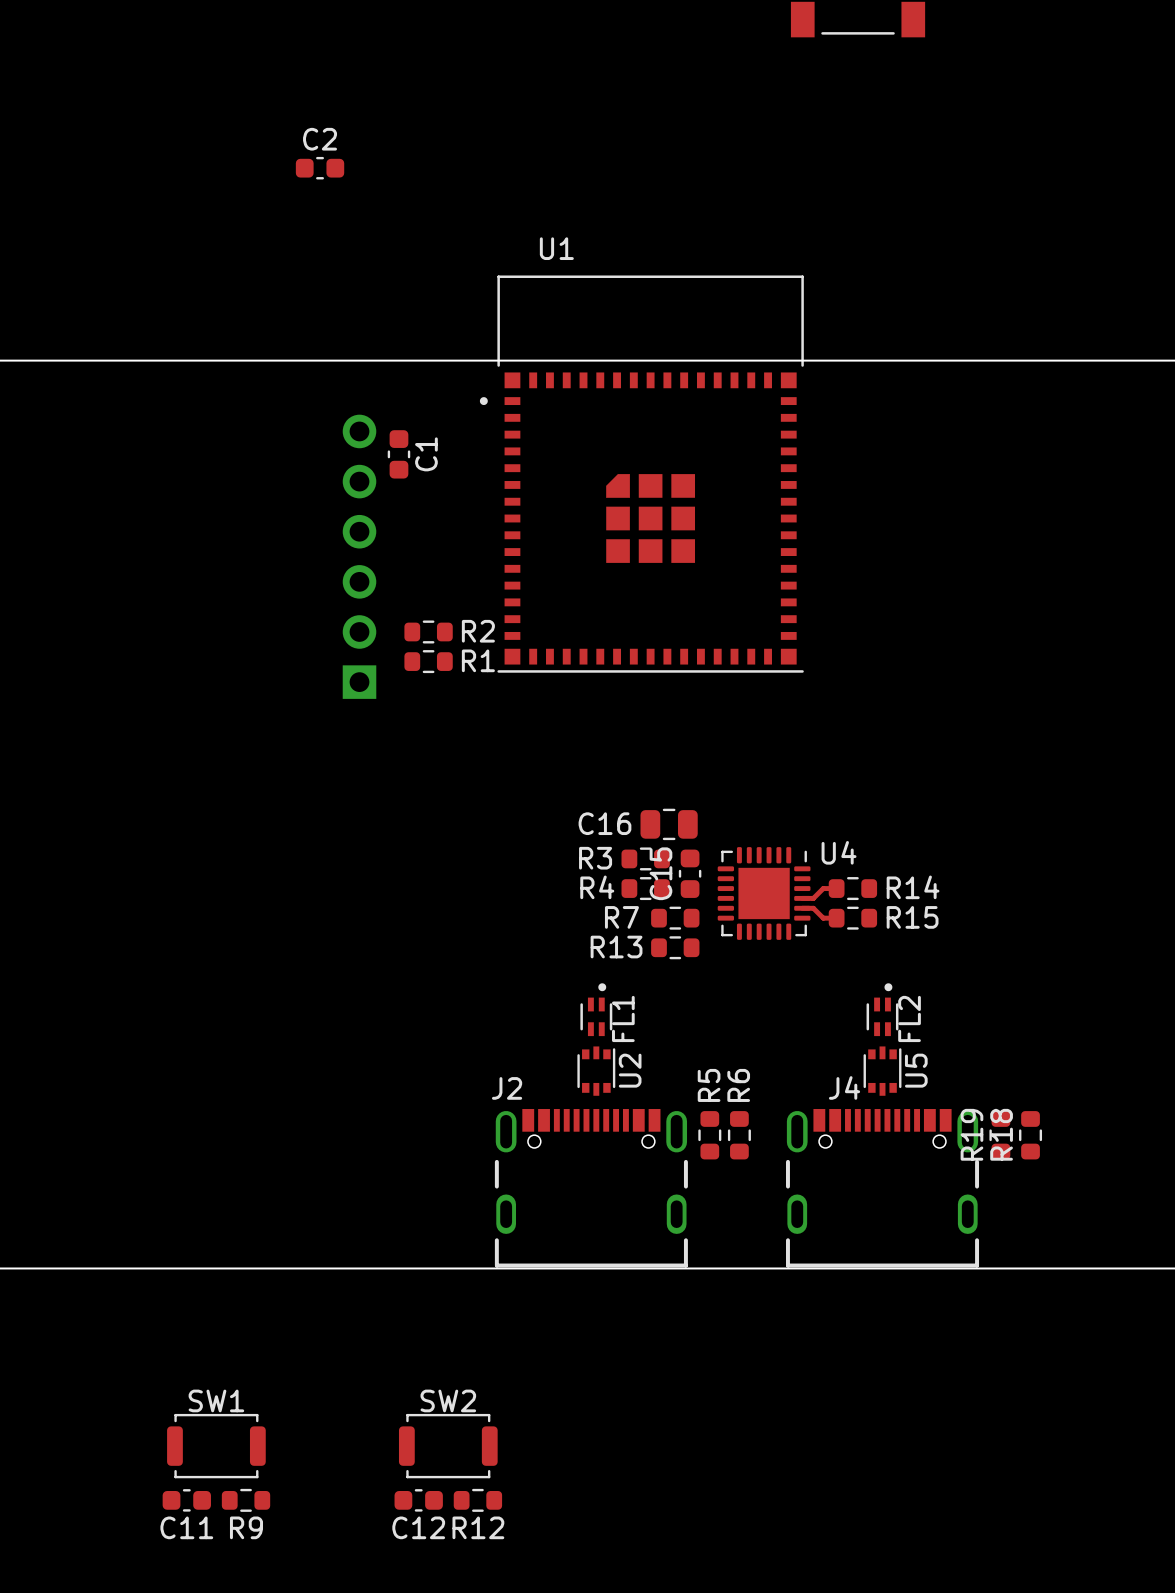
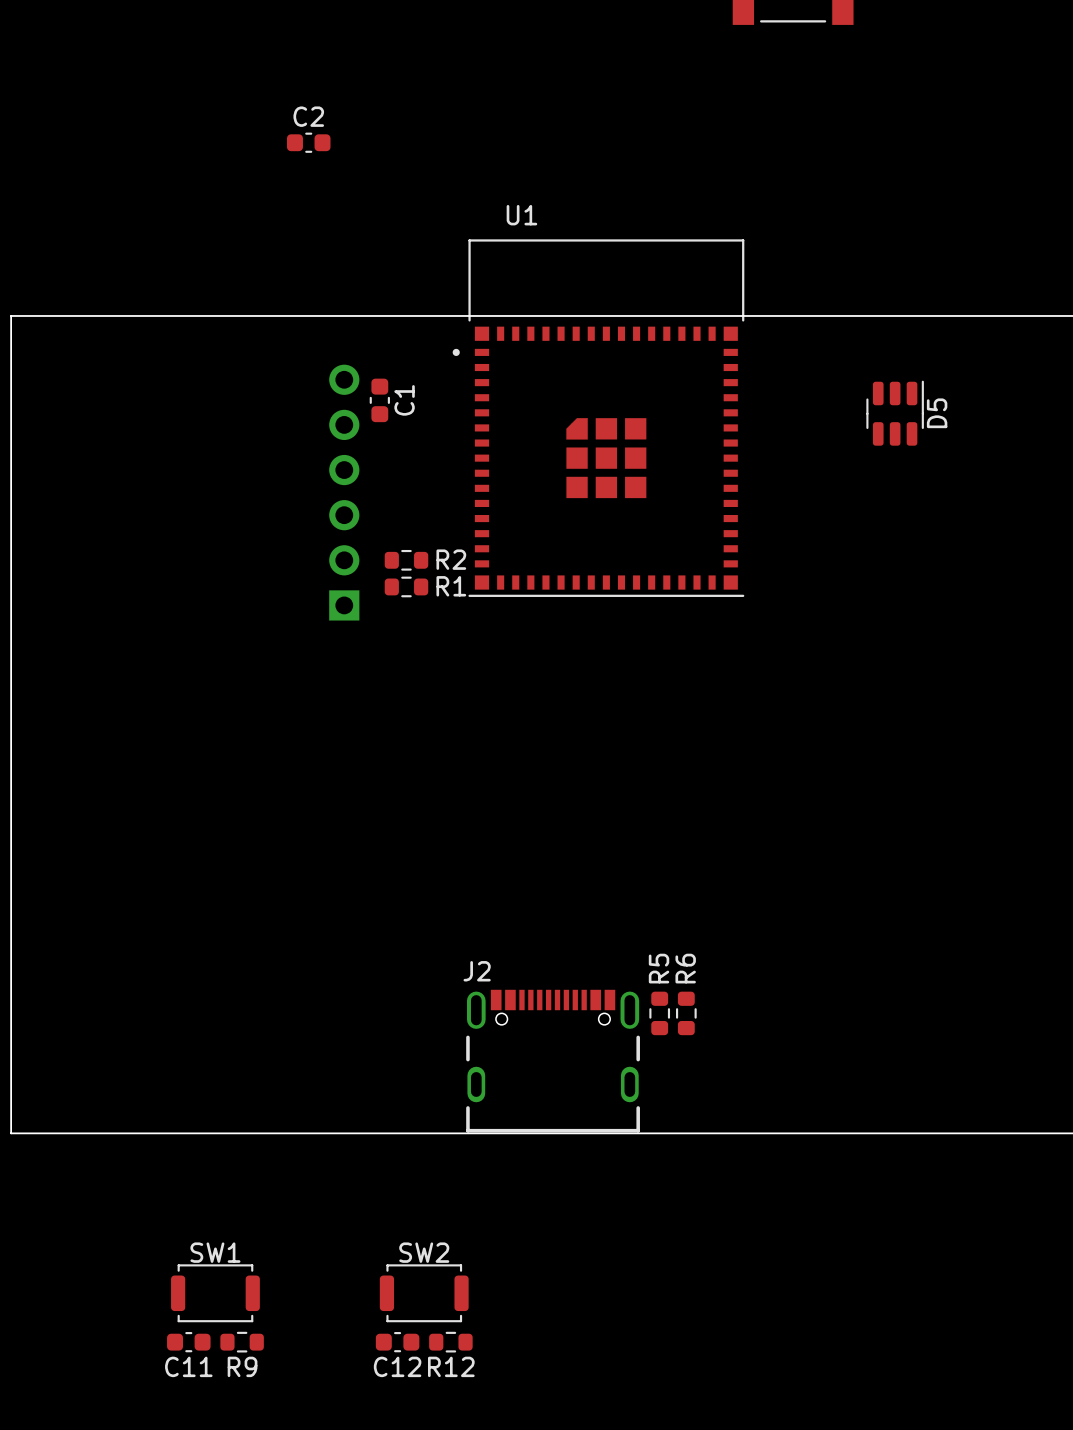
D5: none -> (895, 413)
C16: (669, 824) -> none
R3: (645, 858) -> none
C15: (690, 873) -> none
R4: (645, 888) -> none
top track: (836, 888) (823, 888) (813, 898) (802, 898) -> none
R14: (852, 888) -> none
U4: (764, 893) -> none
top track: (802, 908) (813, 908) (823, 918) (836, 918) -> none
R7: (675, 918) -> none
R15: (852, 918) -> none
R13: (675, 947) -> none
FL1: (596, 1009) -> none
FL2: (882, 1009) -> none
U2: (596, 1071) -> none
U5: (882, 1071) -> none
R19: (1000, 1135) -> none
R18: (1030, 1135) -> none
J4: (882, 1188) -> none

